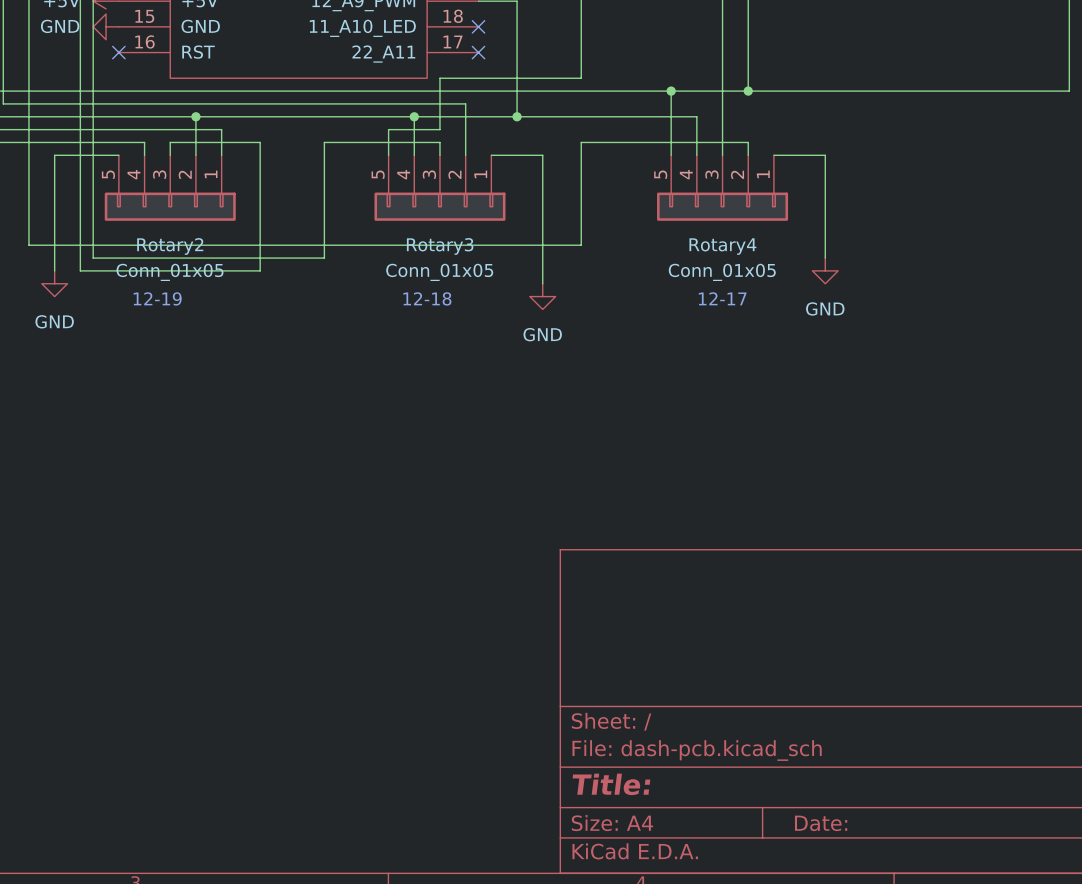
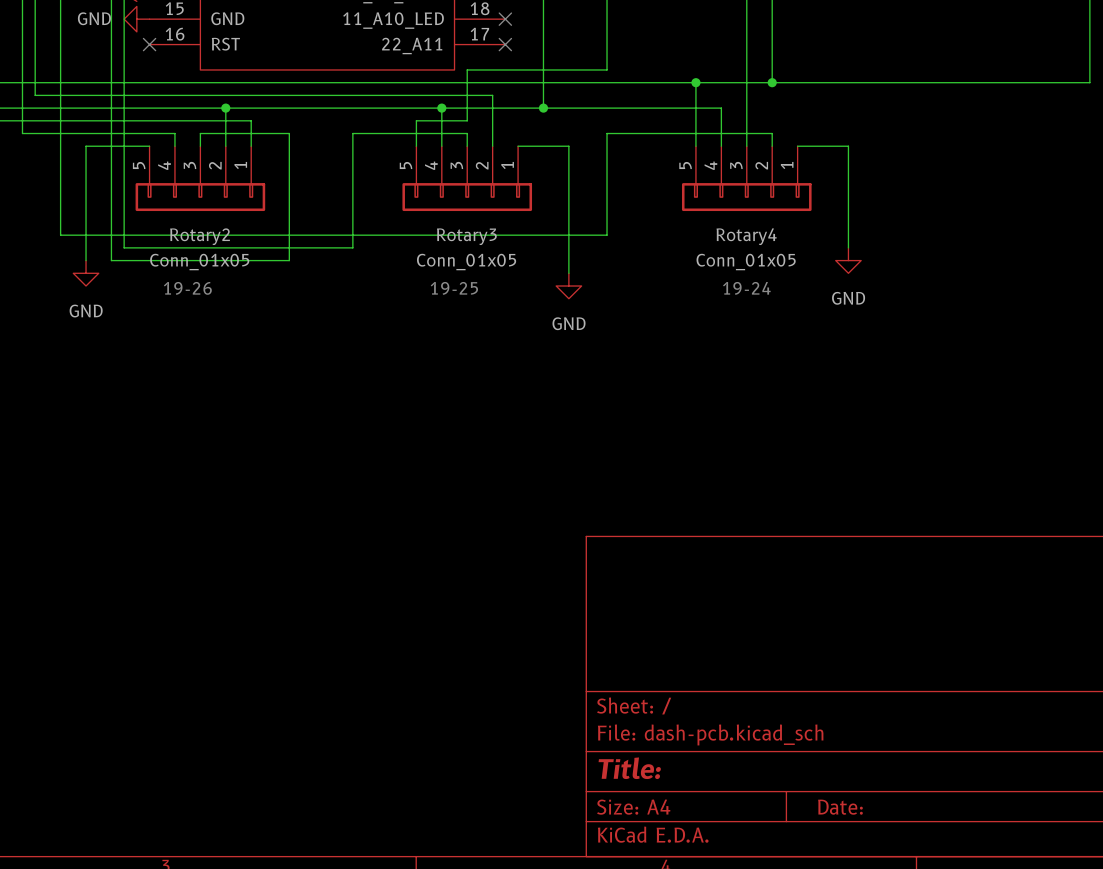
text: 12-19 (157, 298) -> 19-26 (187, 288)
text: 12-18 (427, 298) -> 19-25 (454, 288)
text: 12-17 (722, 298) -> 19-24 (746, 288)

